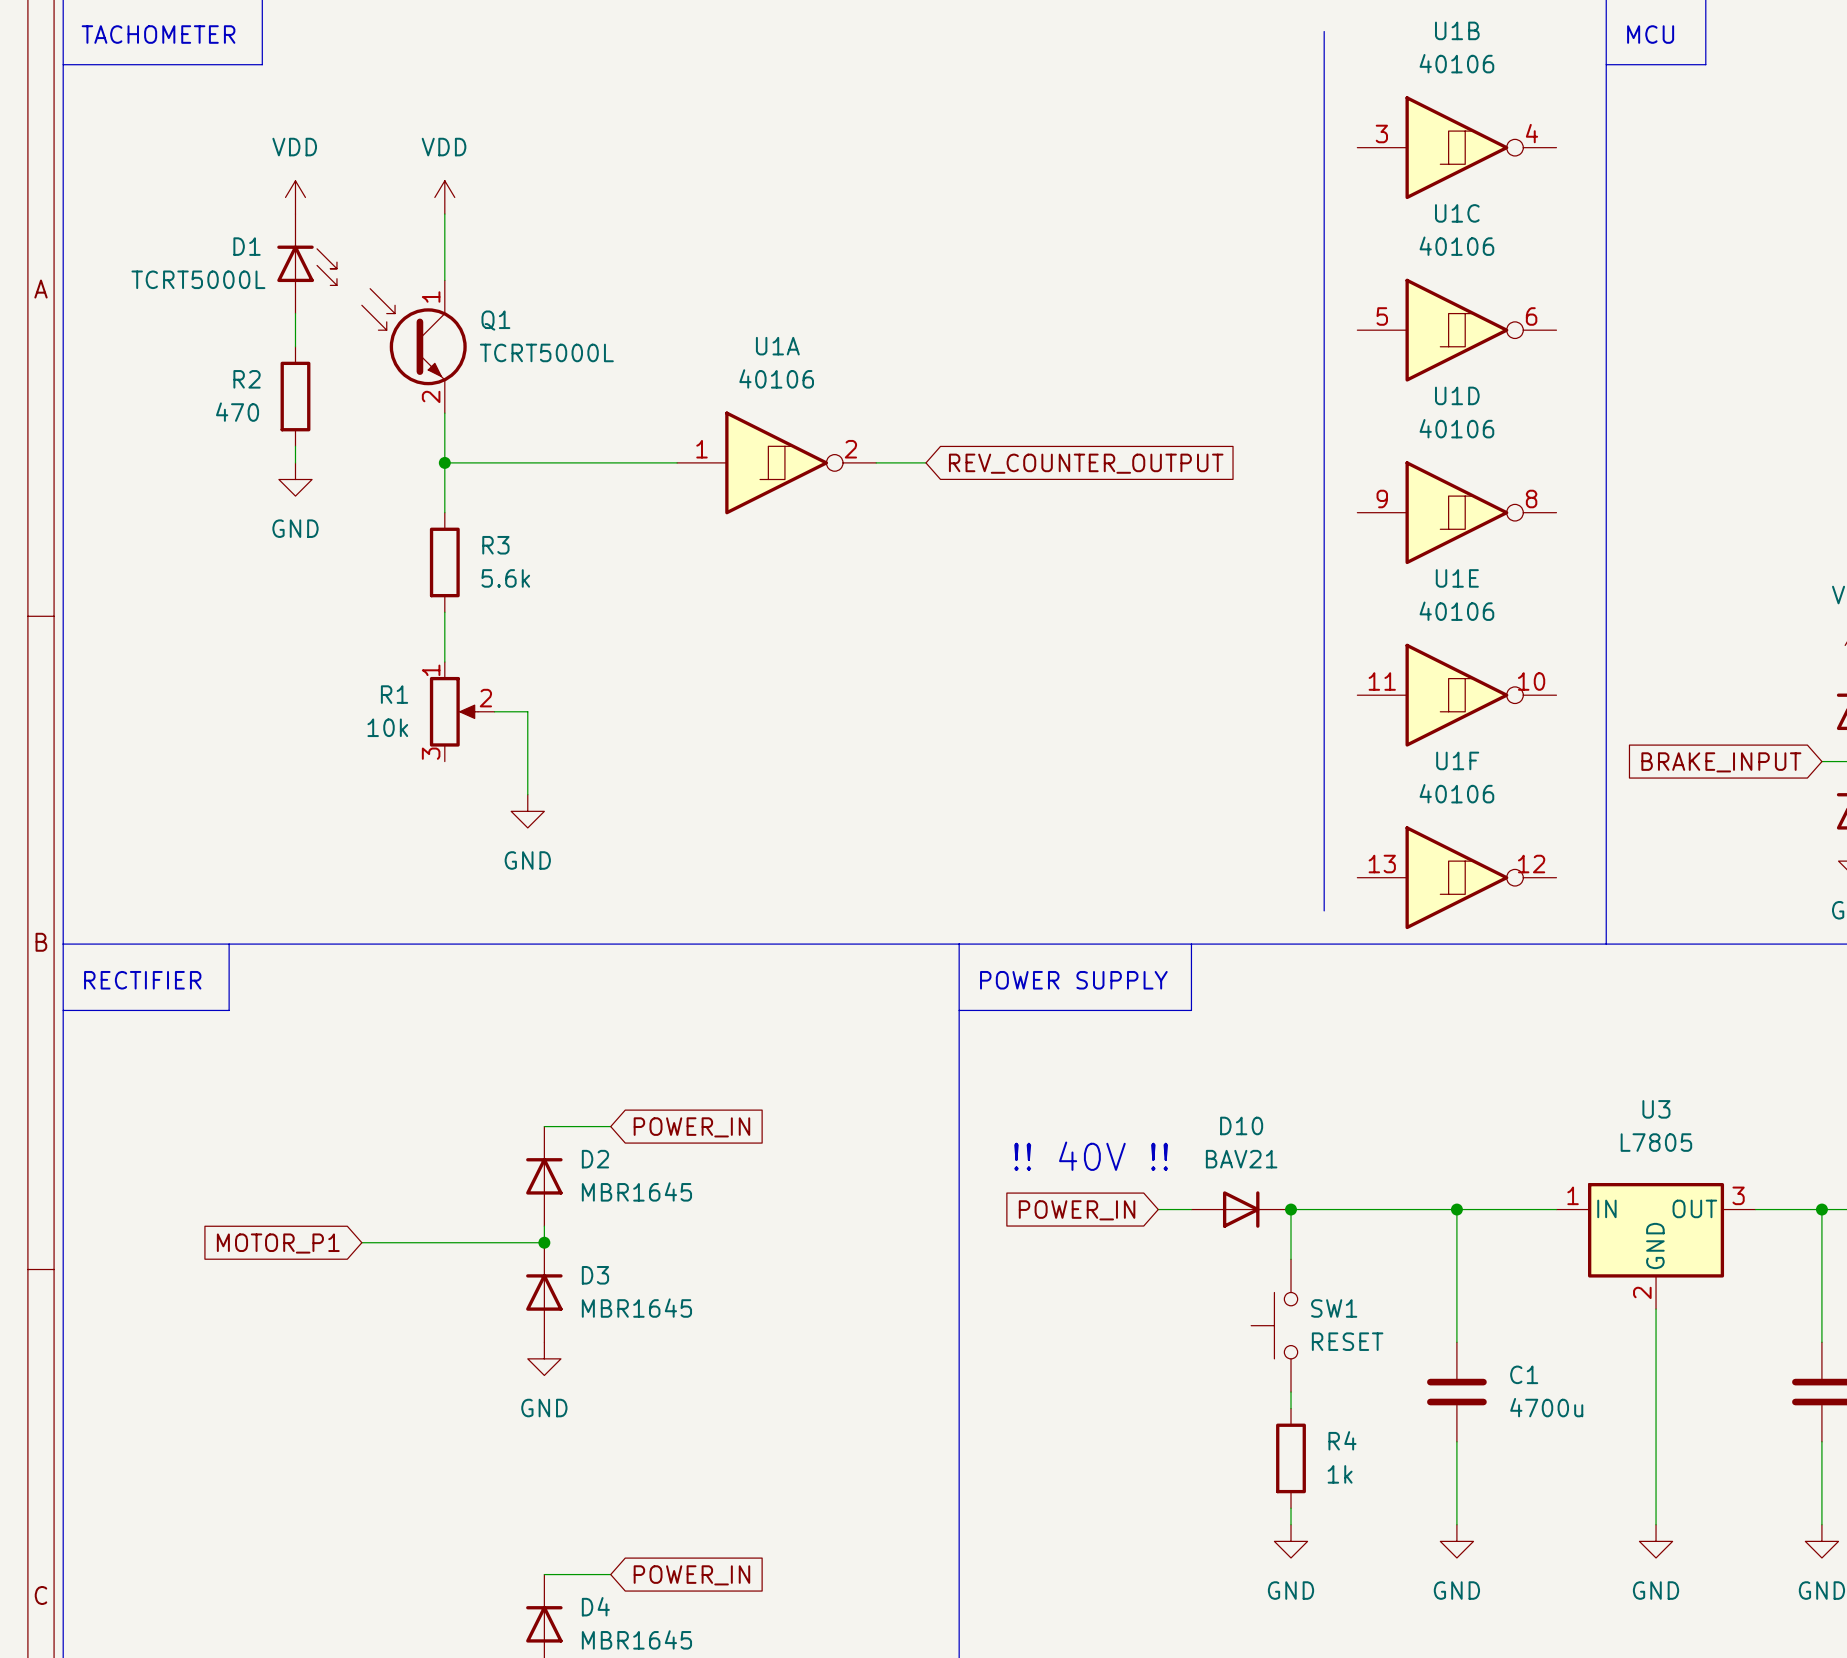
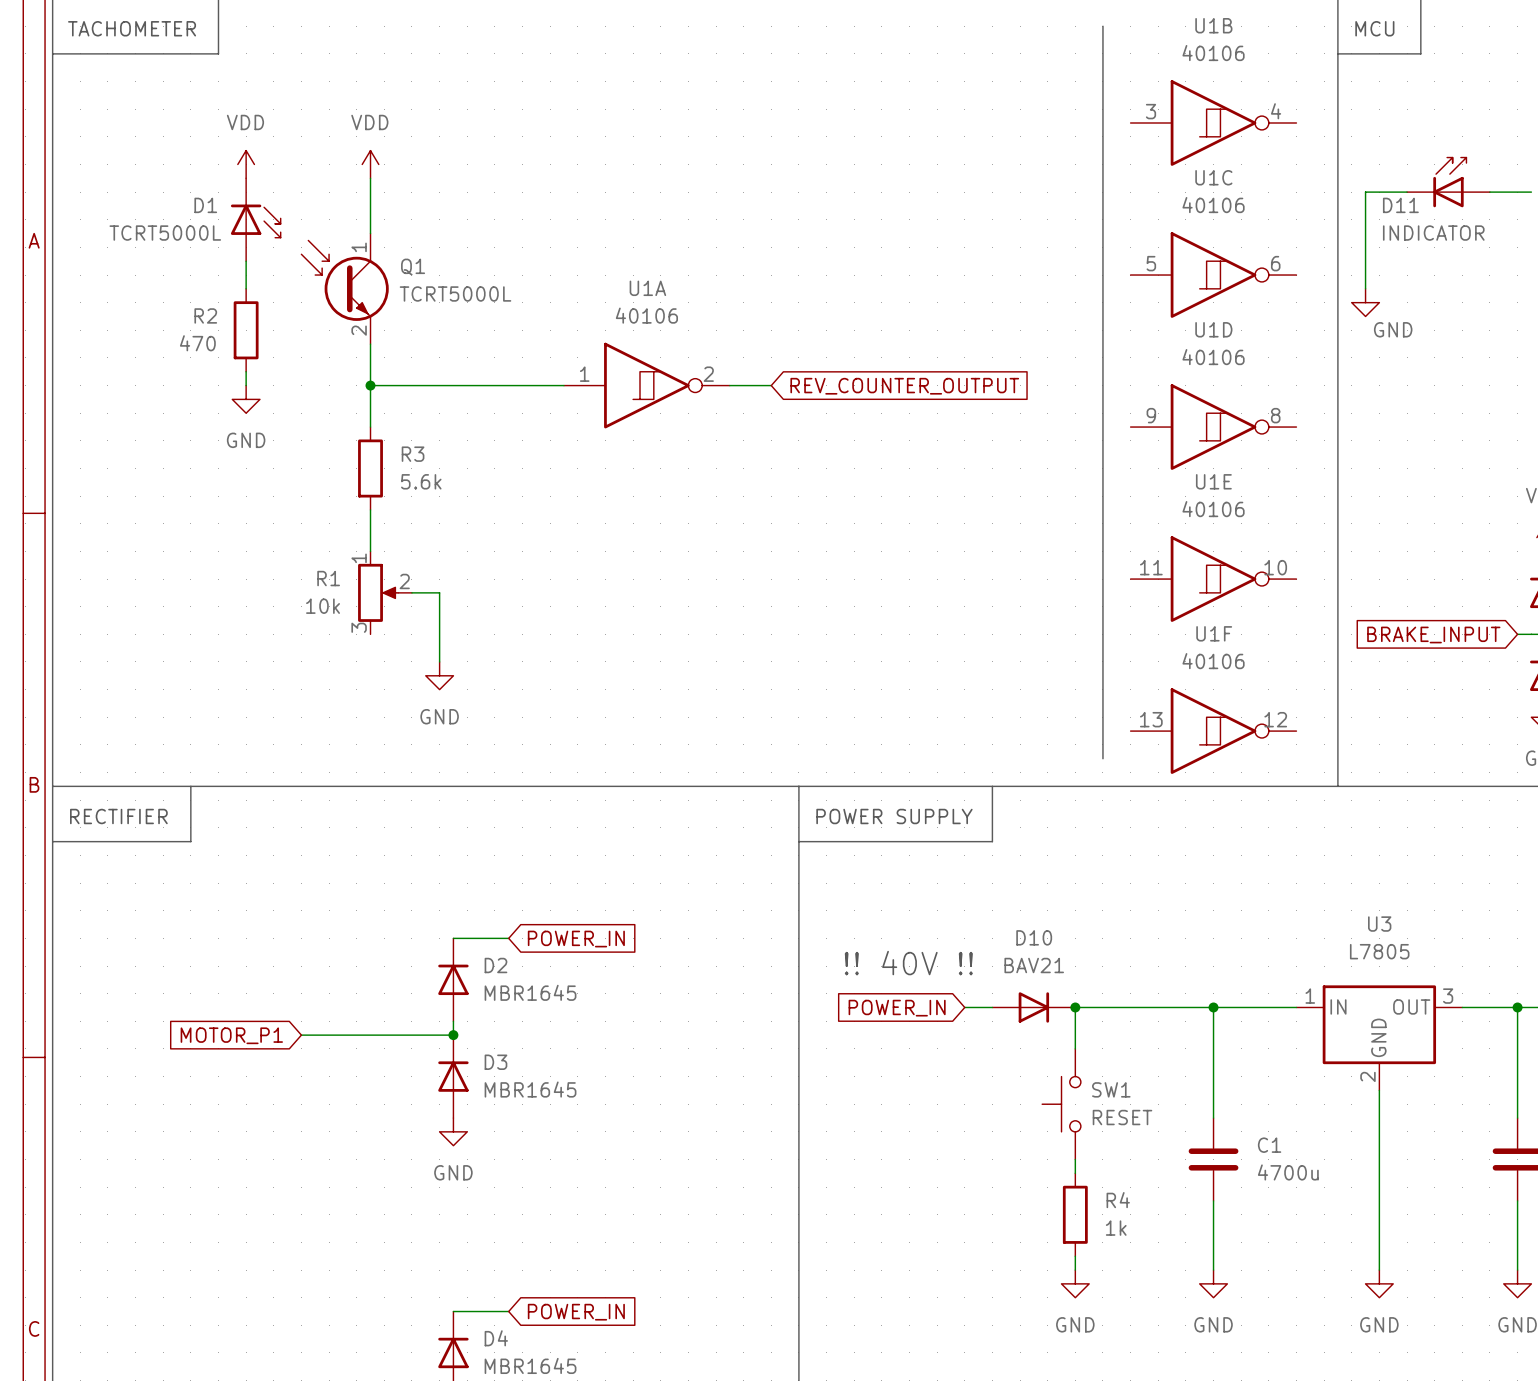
D11: none -> INDICATOR (1448, 182)
wire: none -> (1407, 192) (1365, 192) (1365, 288)
wire: none -> (1489, 192) (1531, 192)
power symbol: none -> GND (1365, 302)

